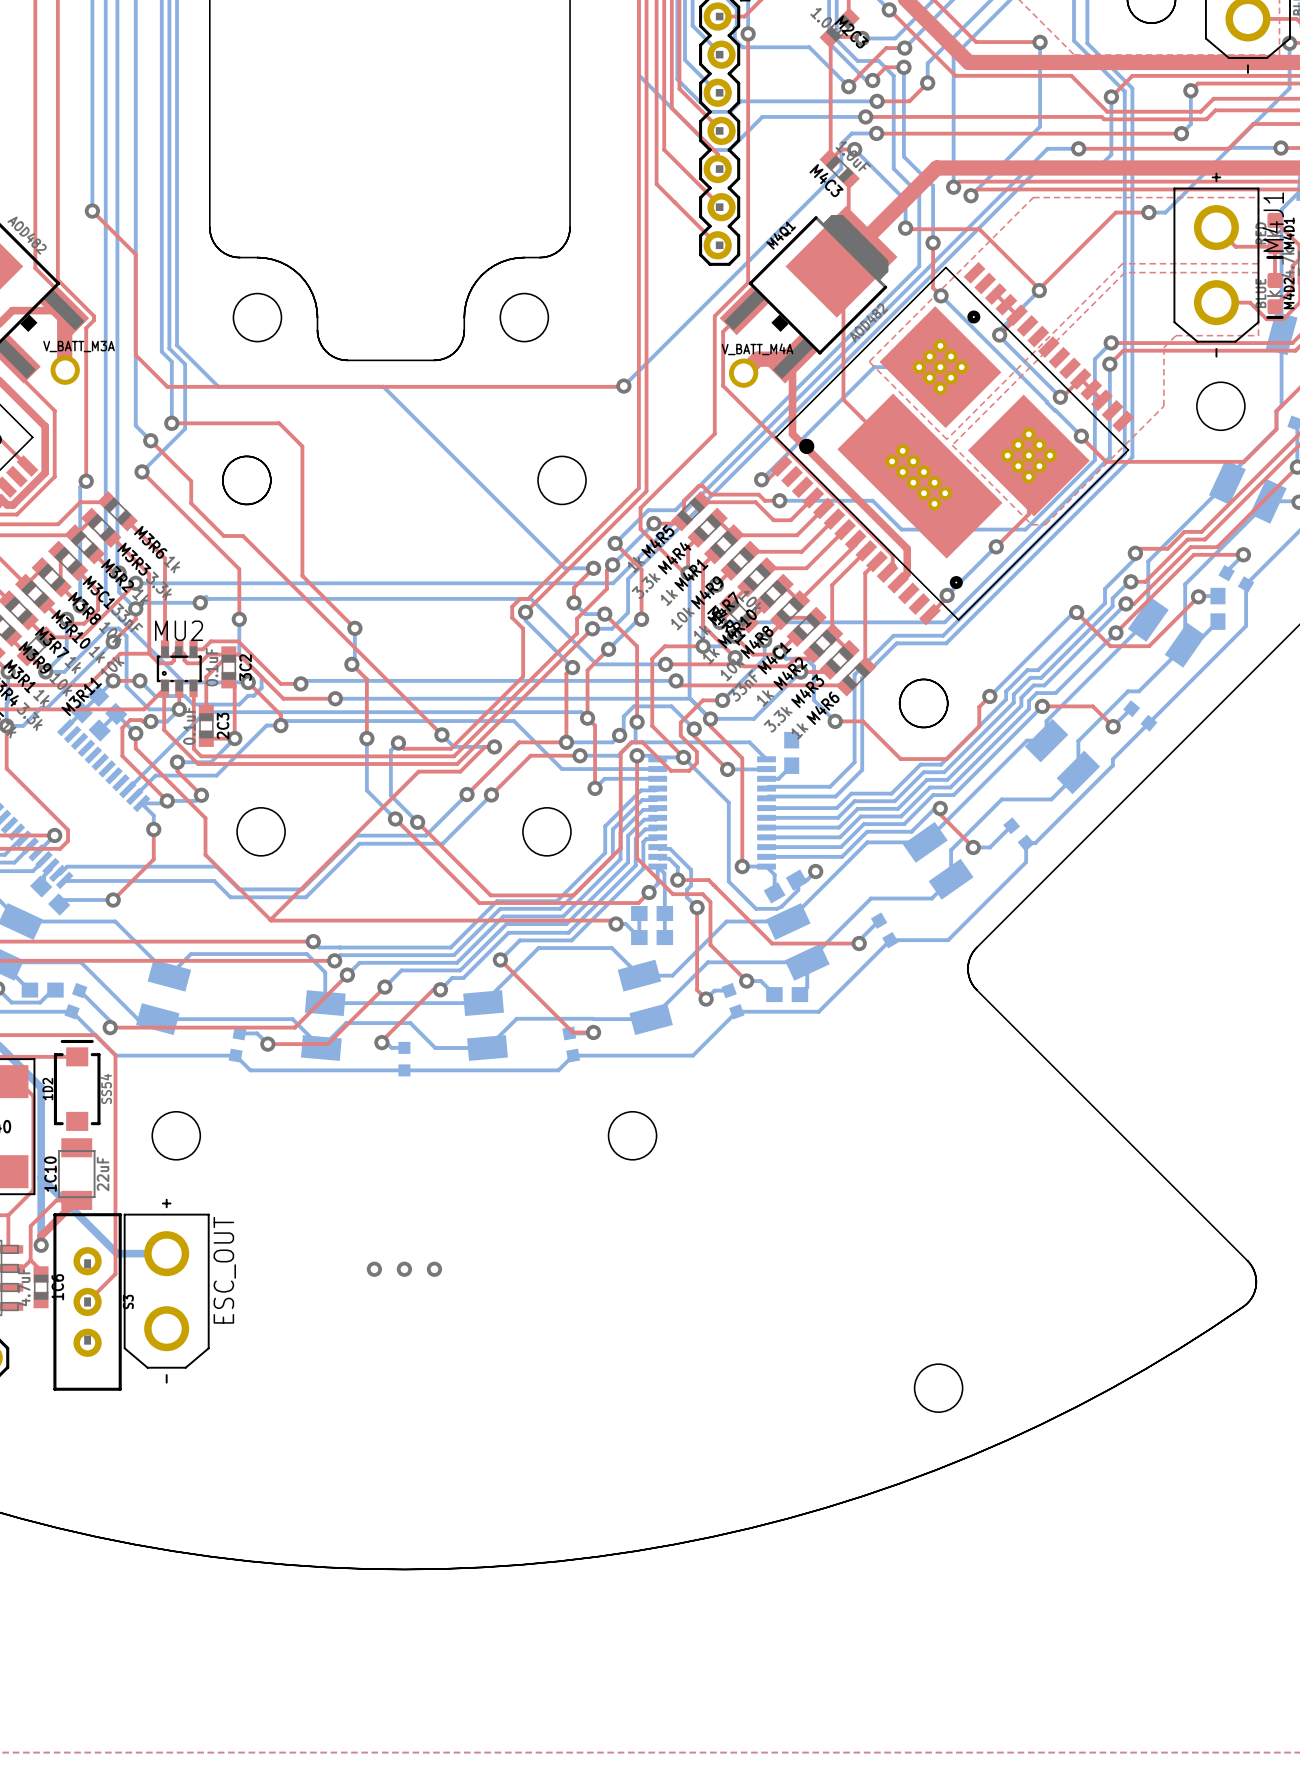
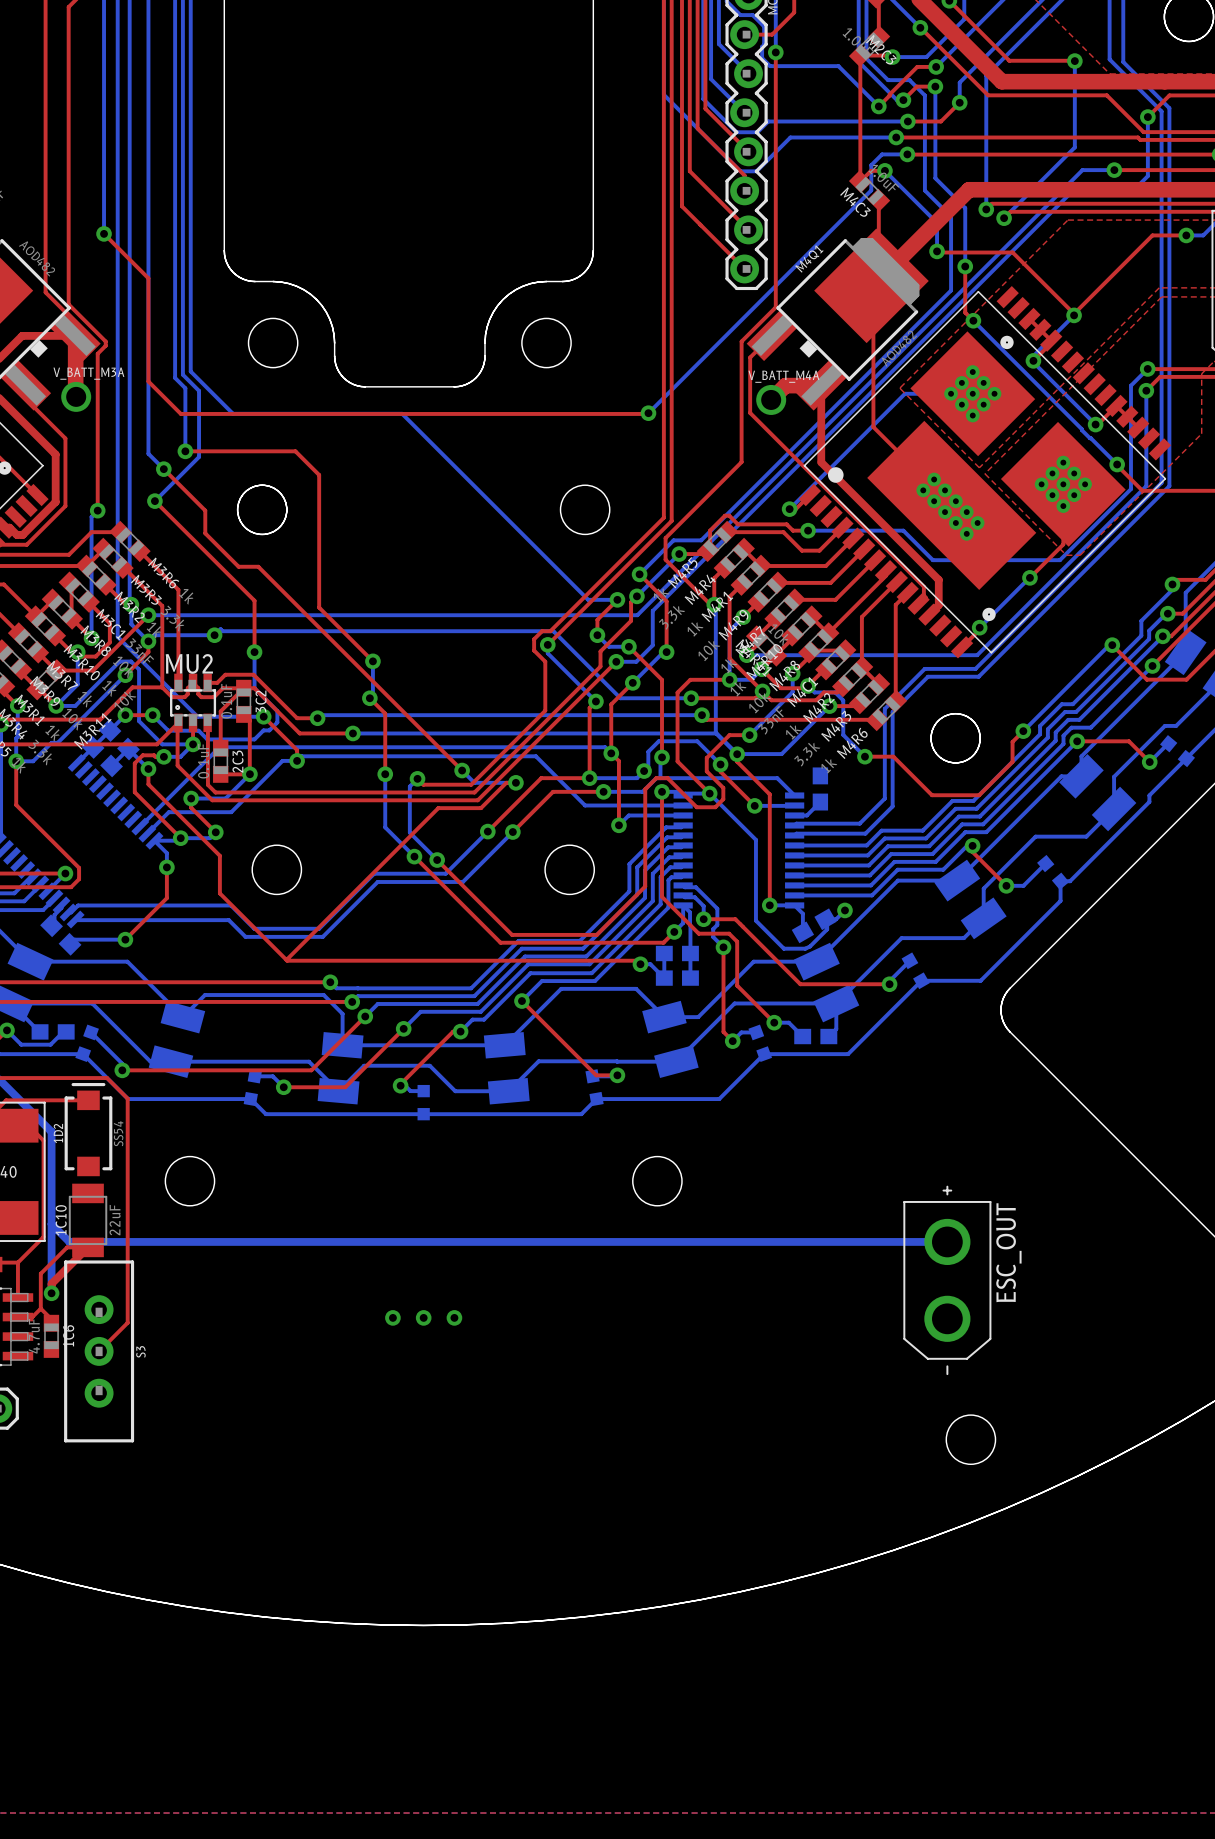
bottom track: (58, 1195) (117, 1253) (166, 1253) -> (69, 1241) (947, 1241)
ESC_OUT: none -> (947, 1280)
ESC_OUT: (166, 1291) -> none

